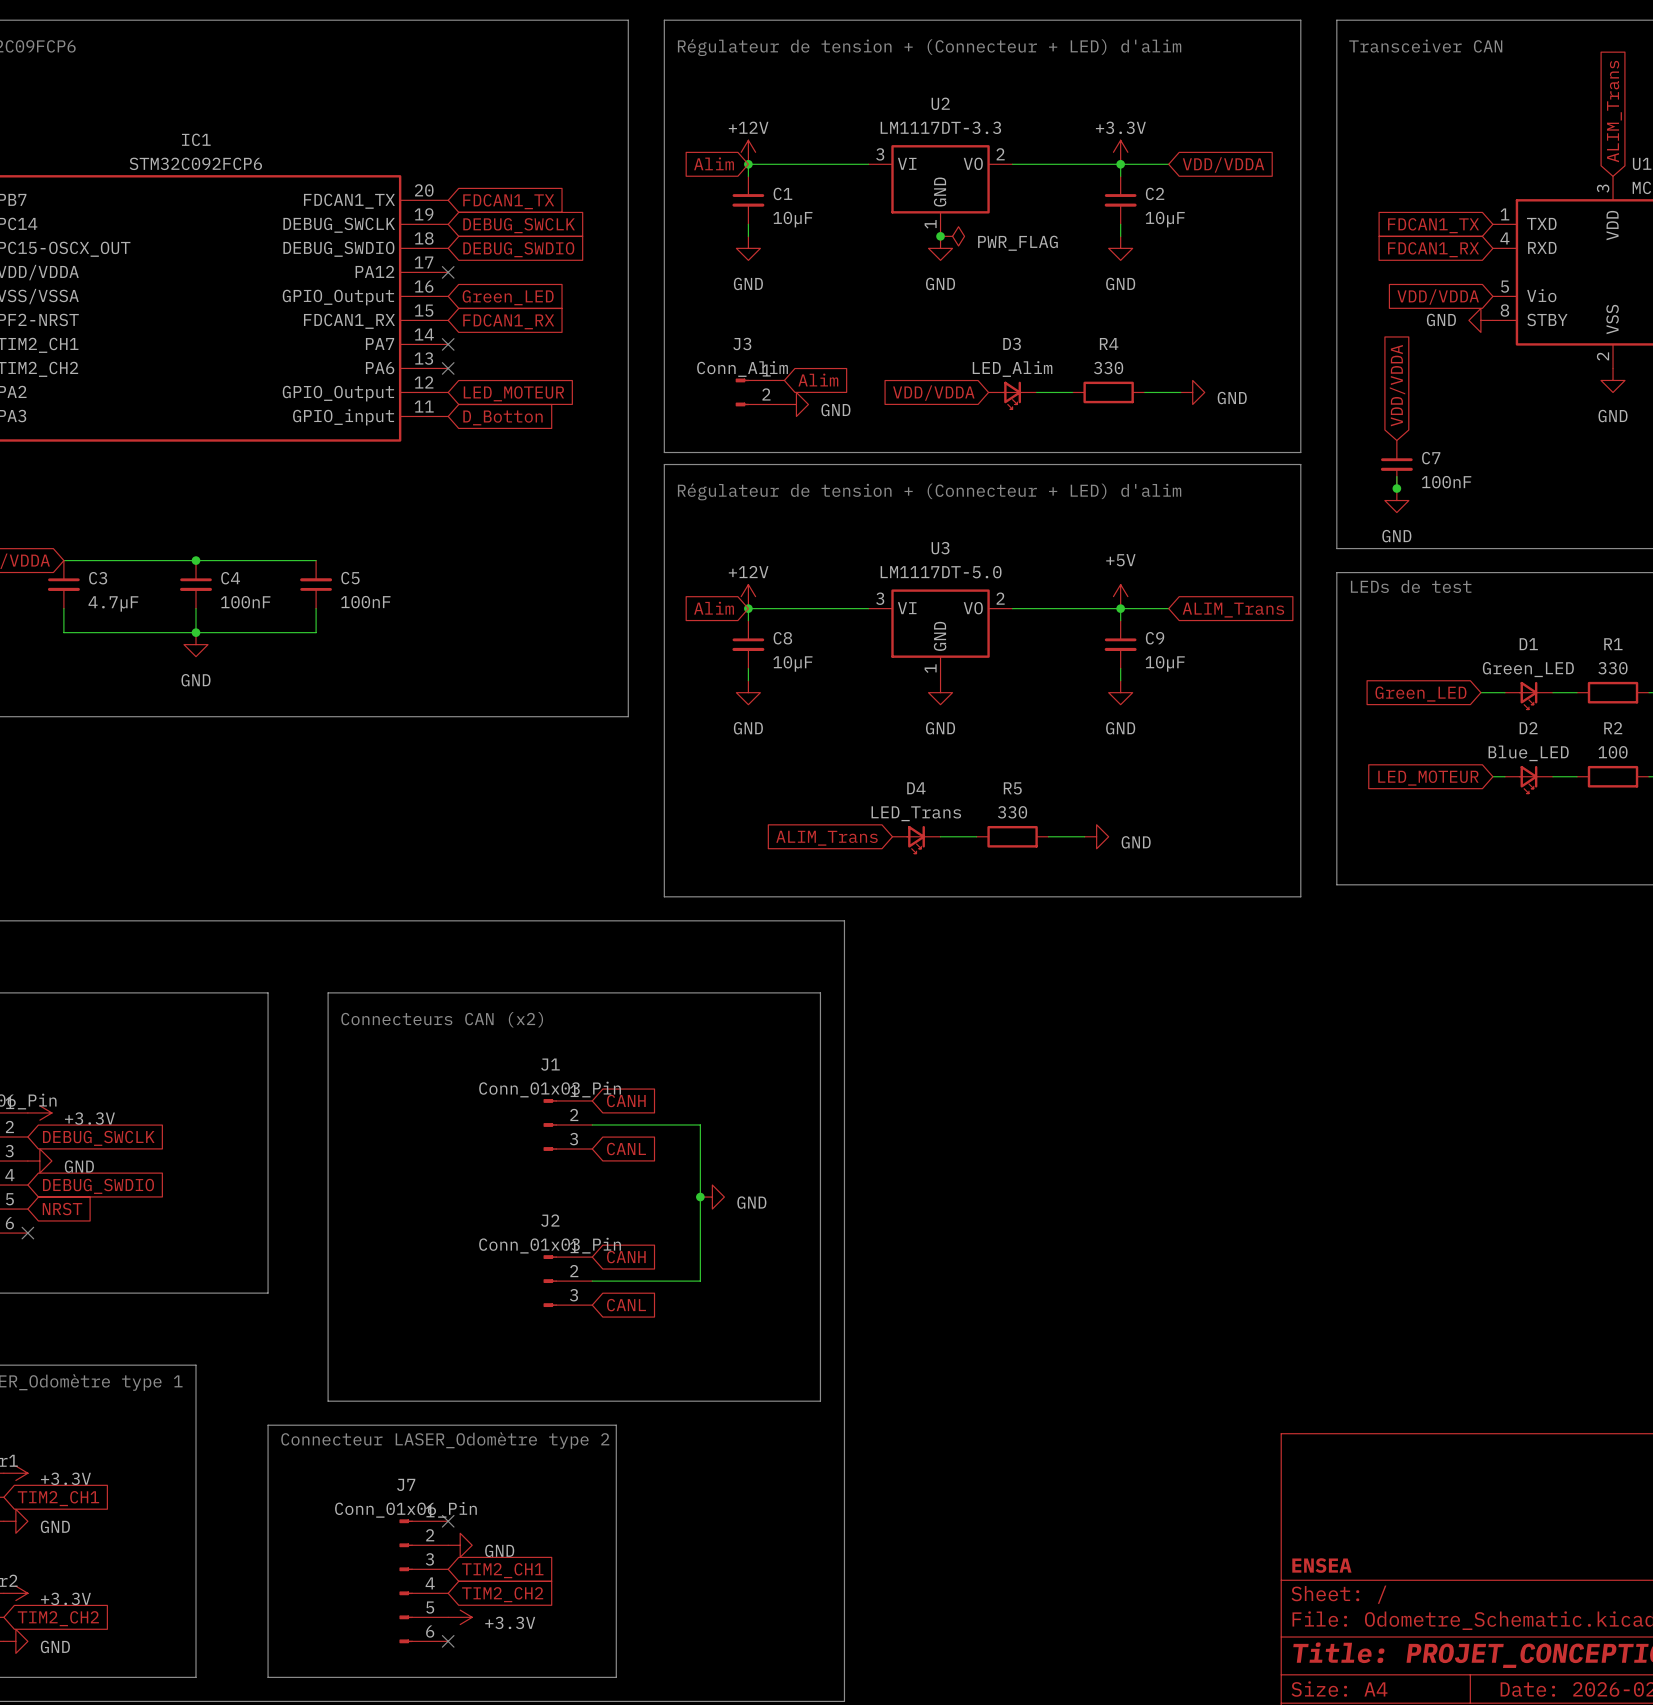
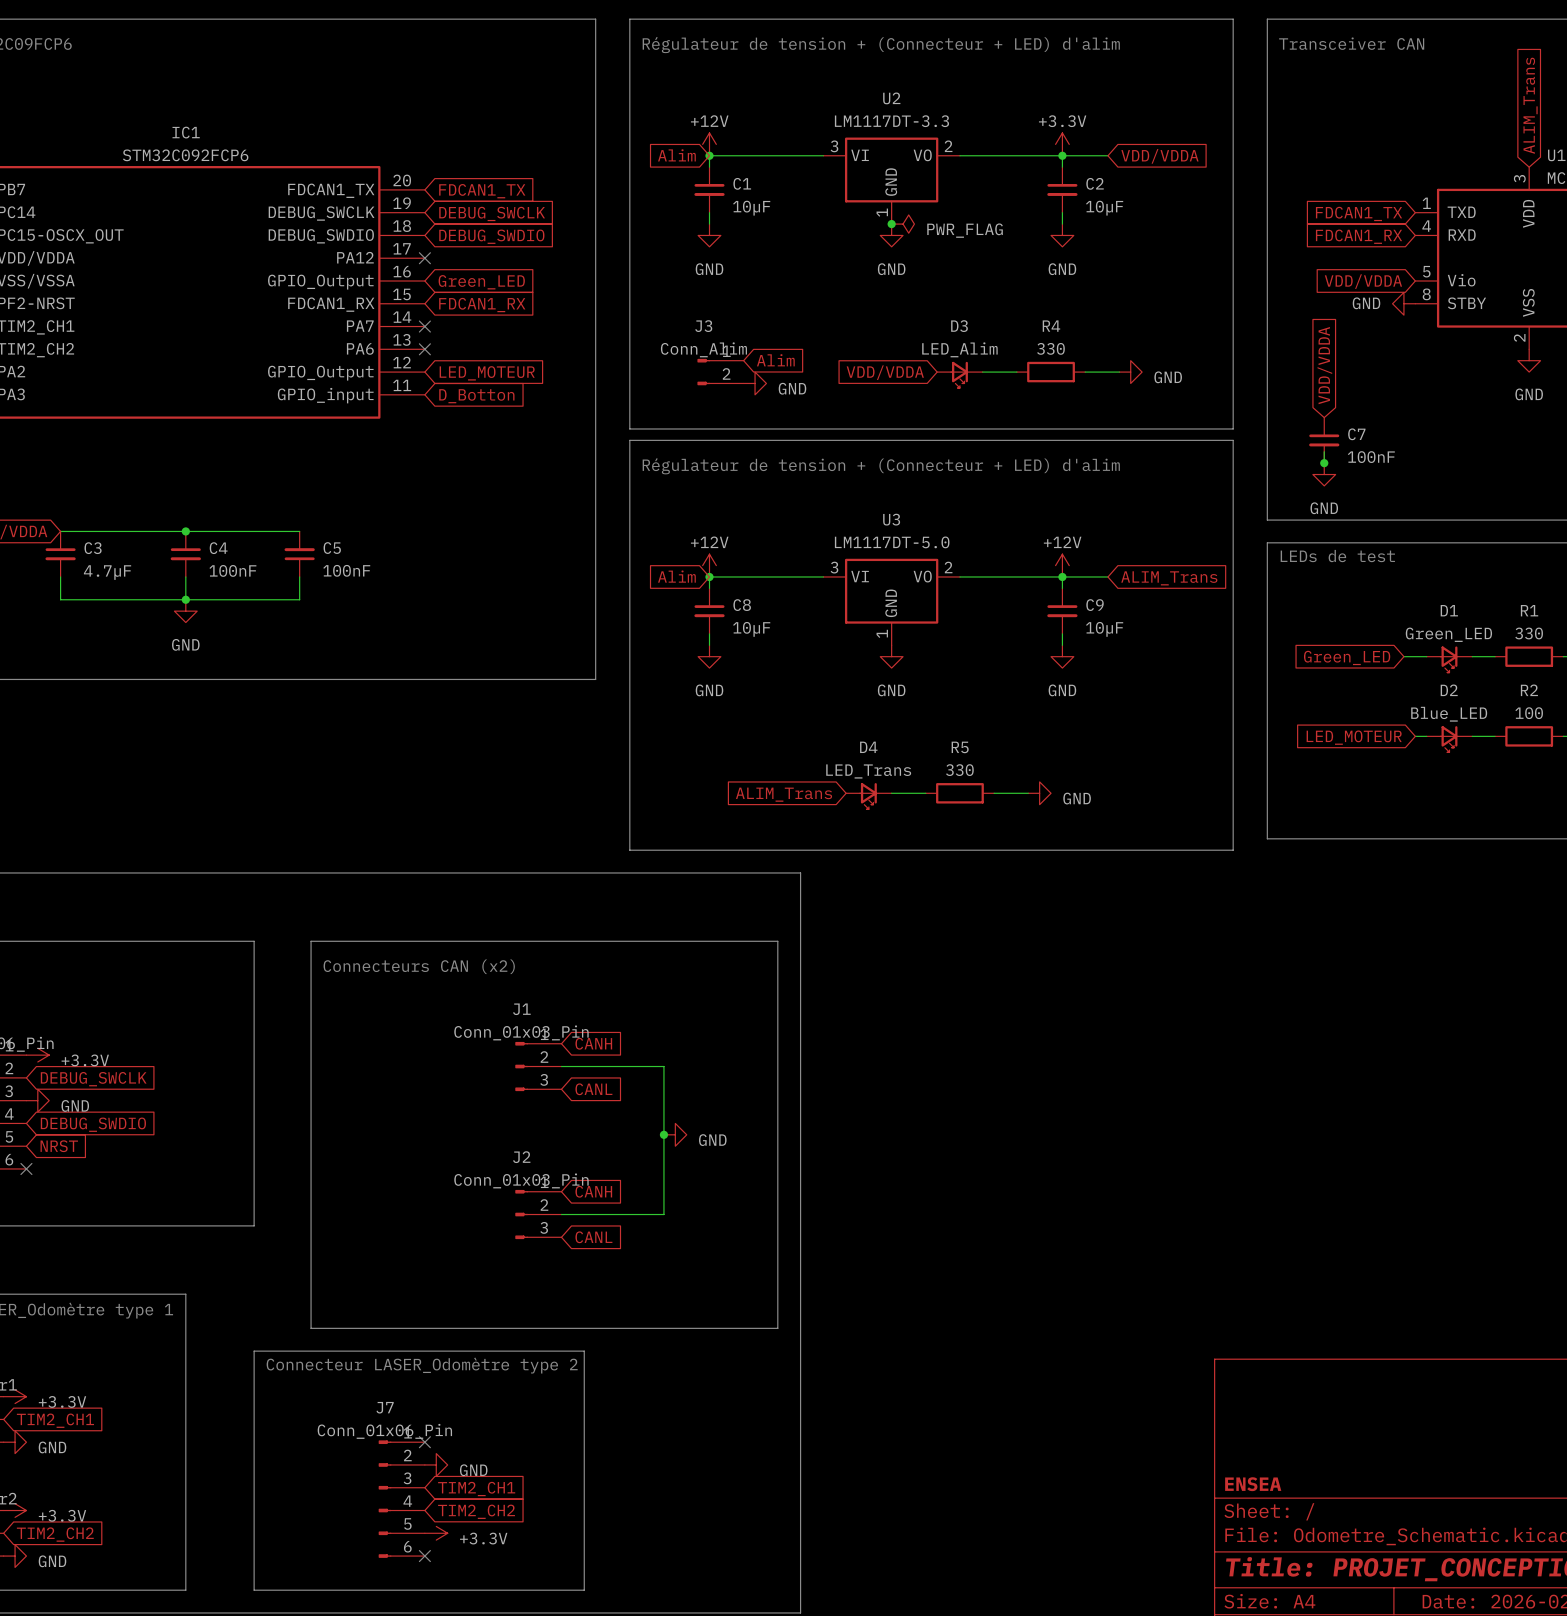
power symbol: +5V (1120, 596) -> +12V (1062, 565)

